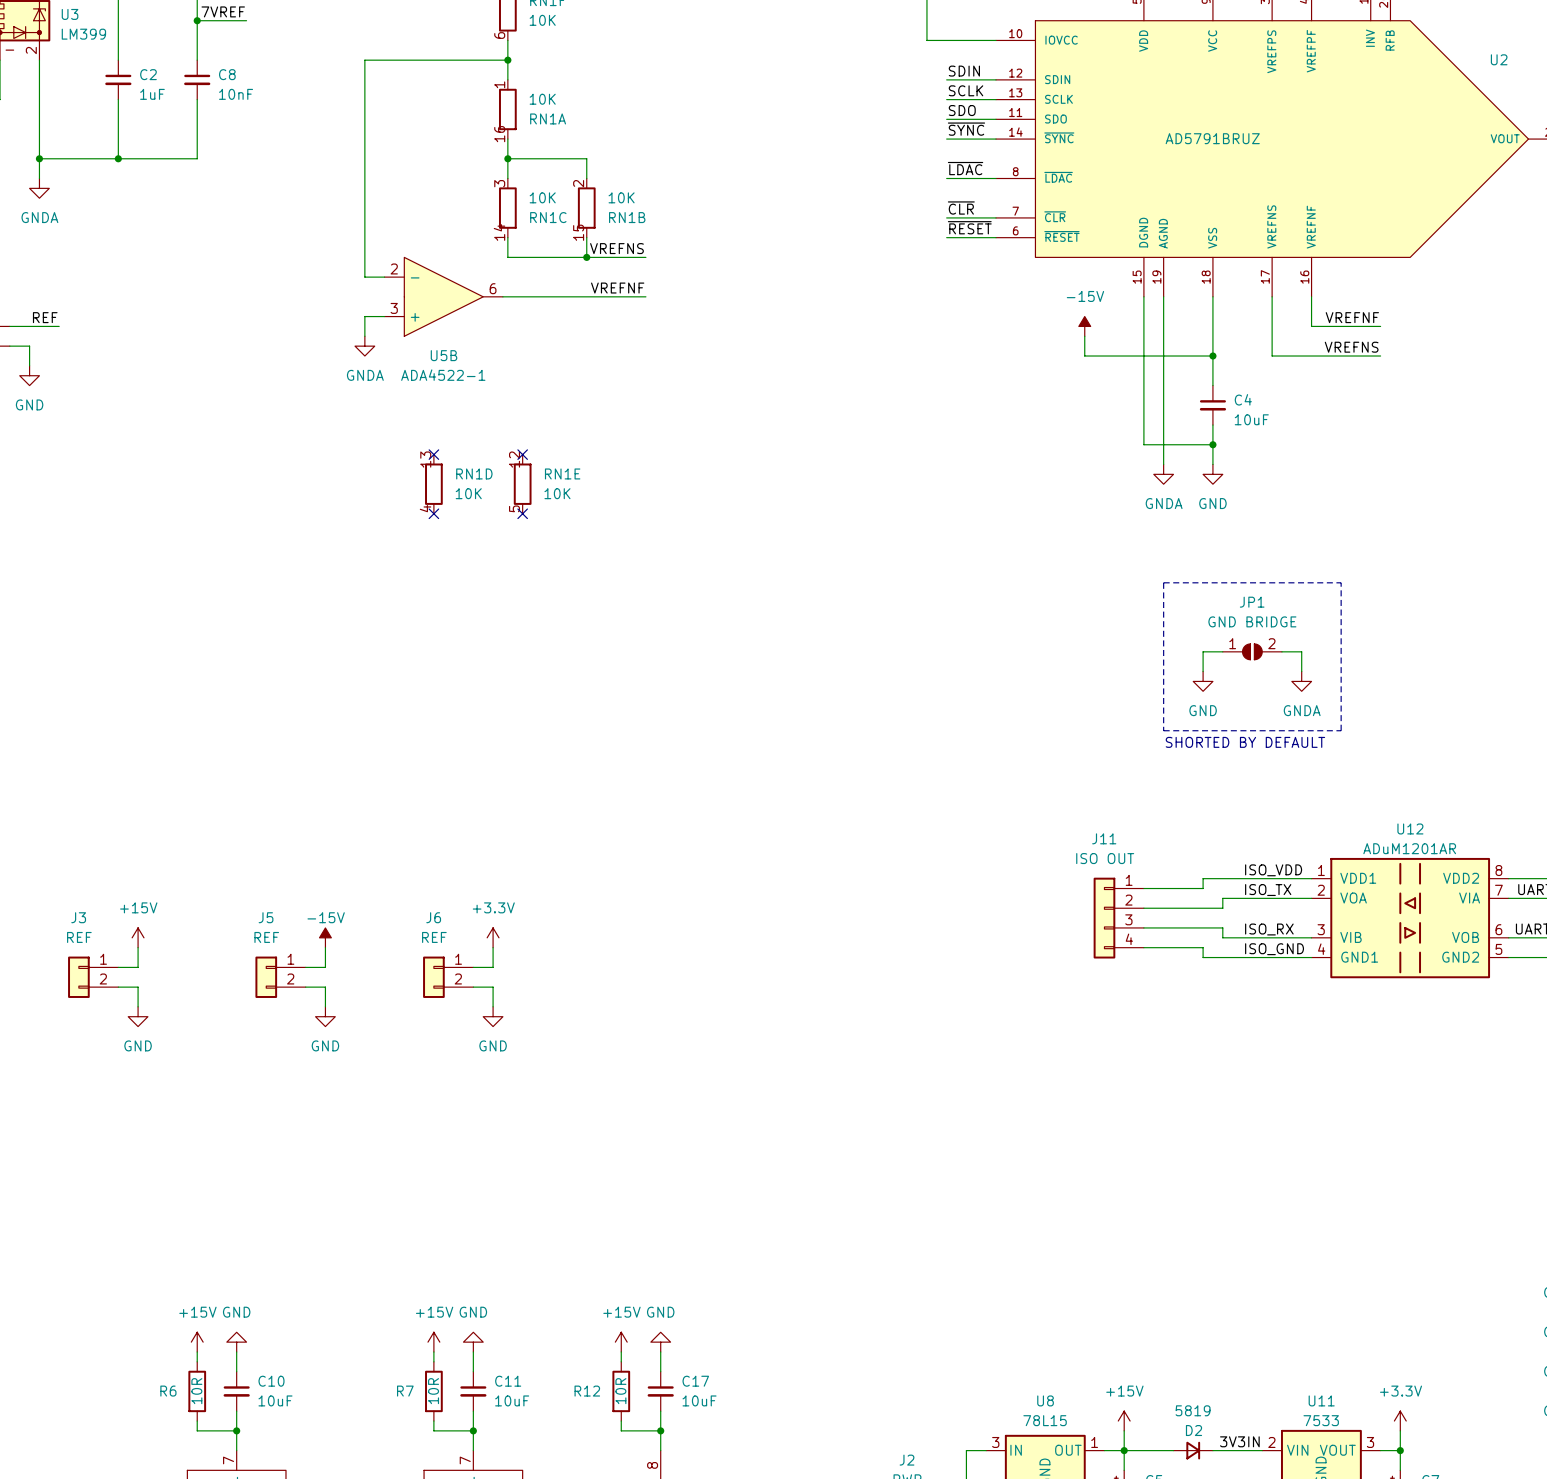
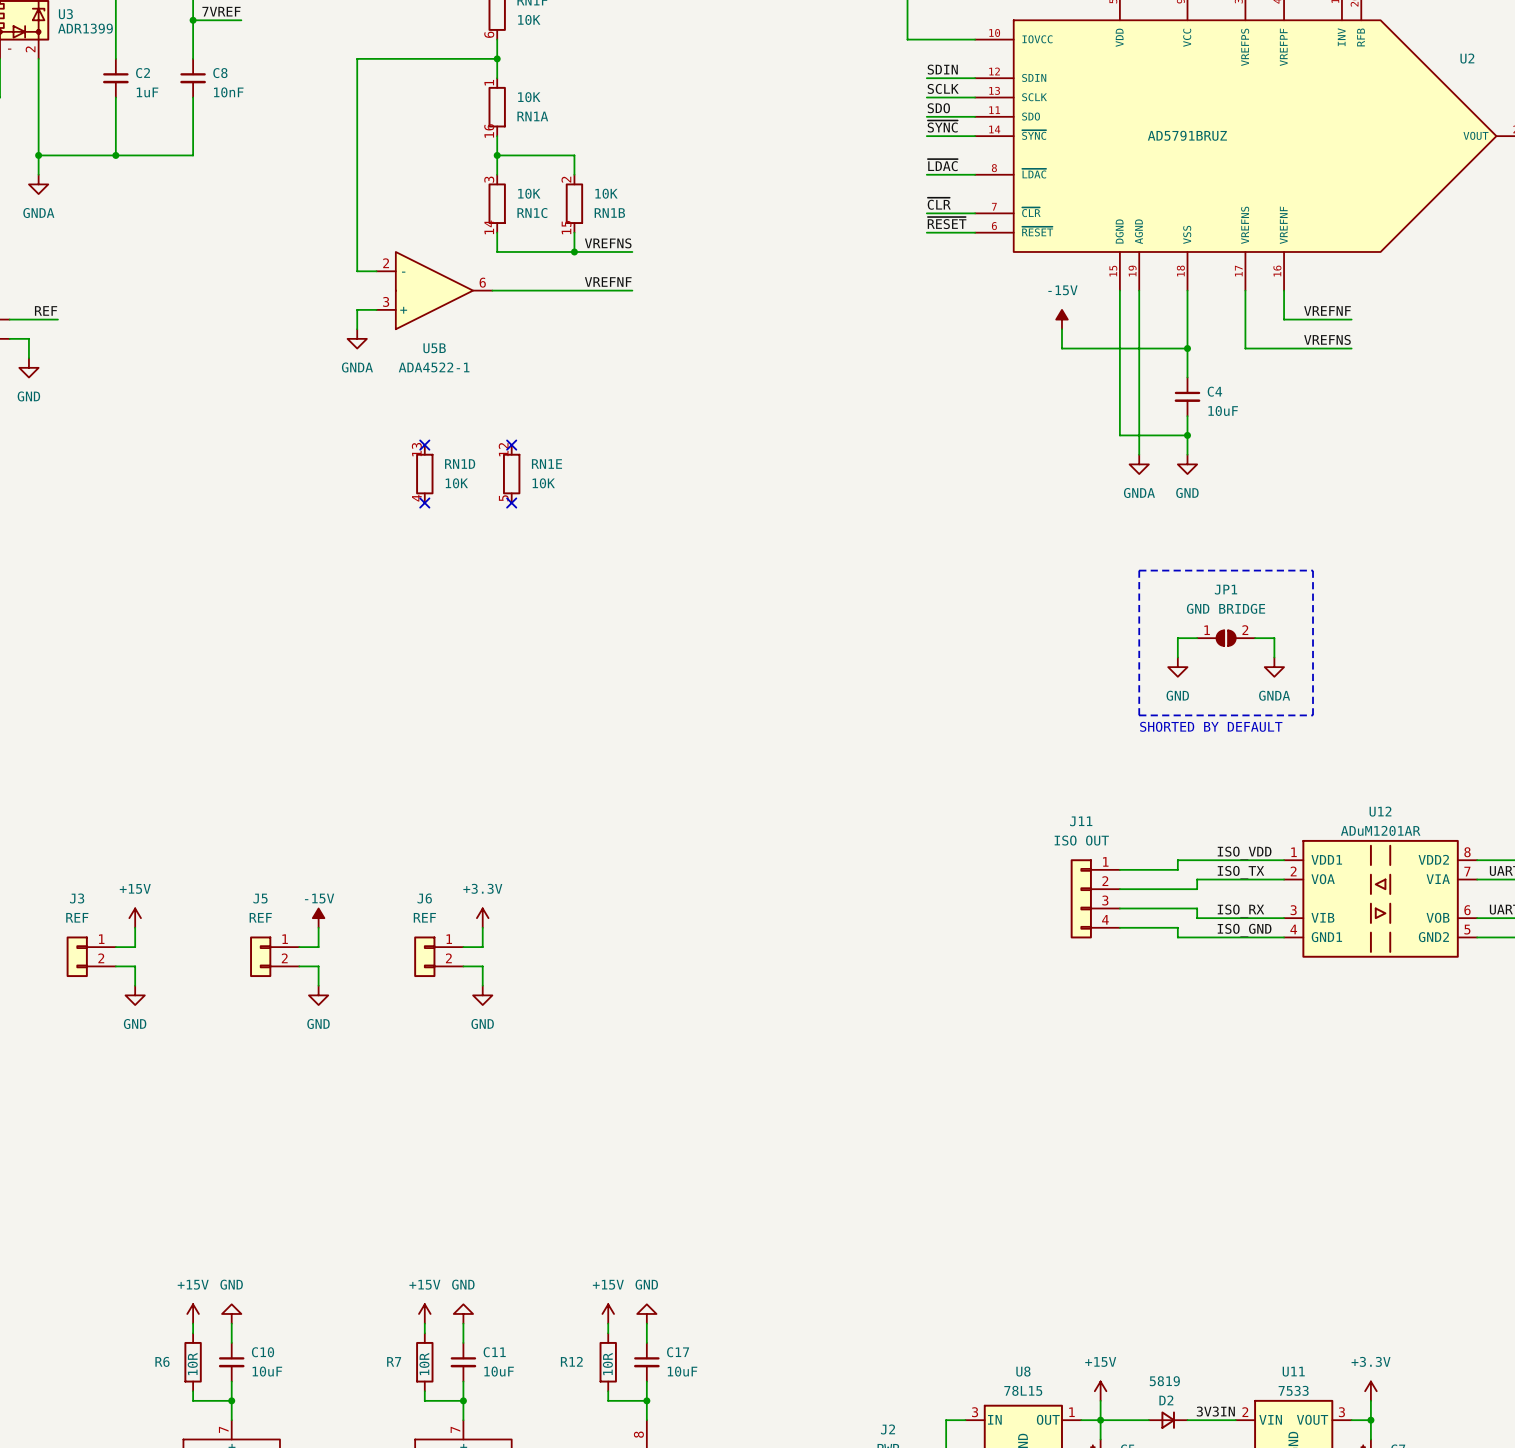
U3 value: LM399 (83, 34) -> ADR1399 (85, 28)

